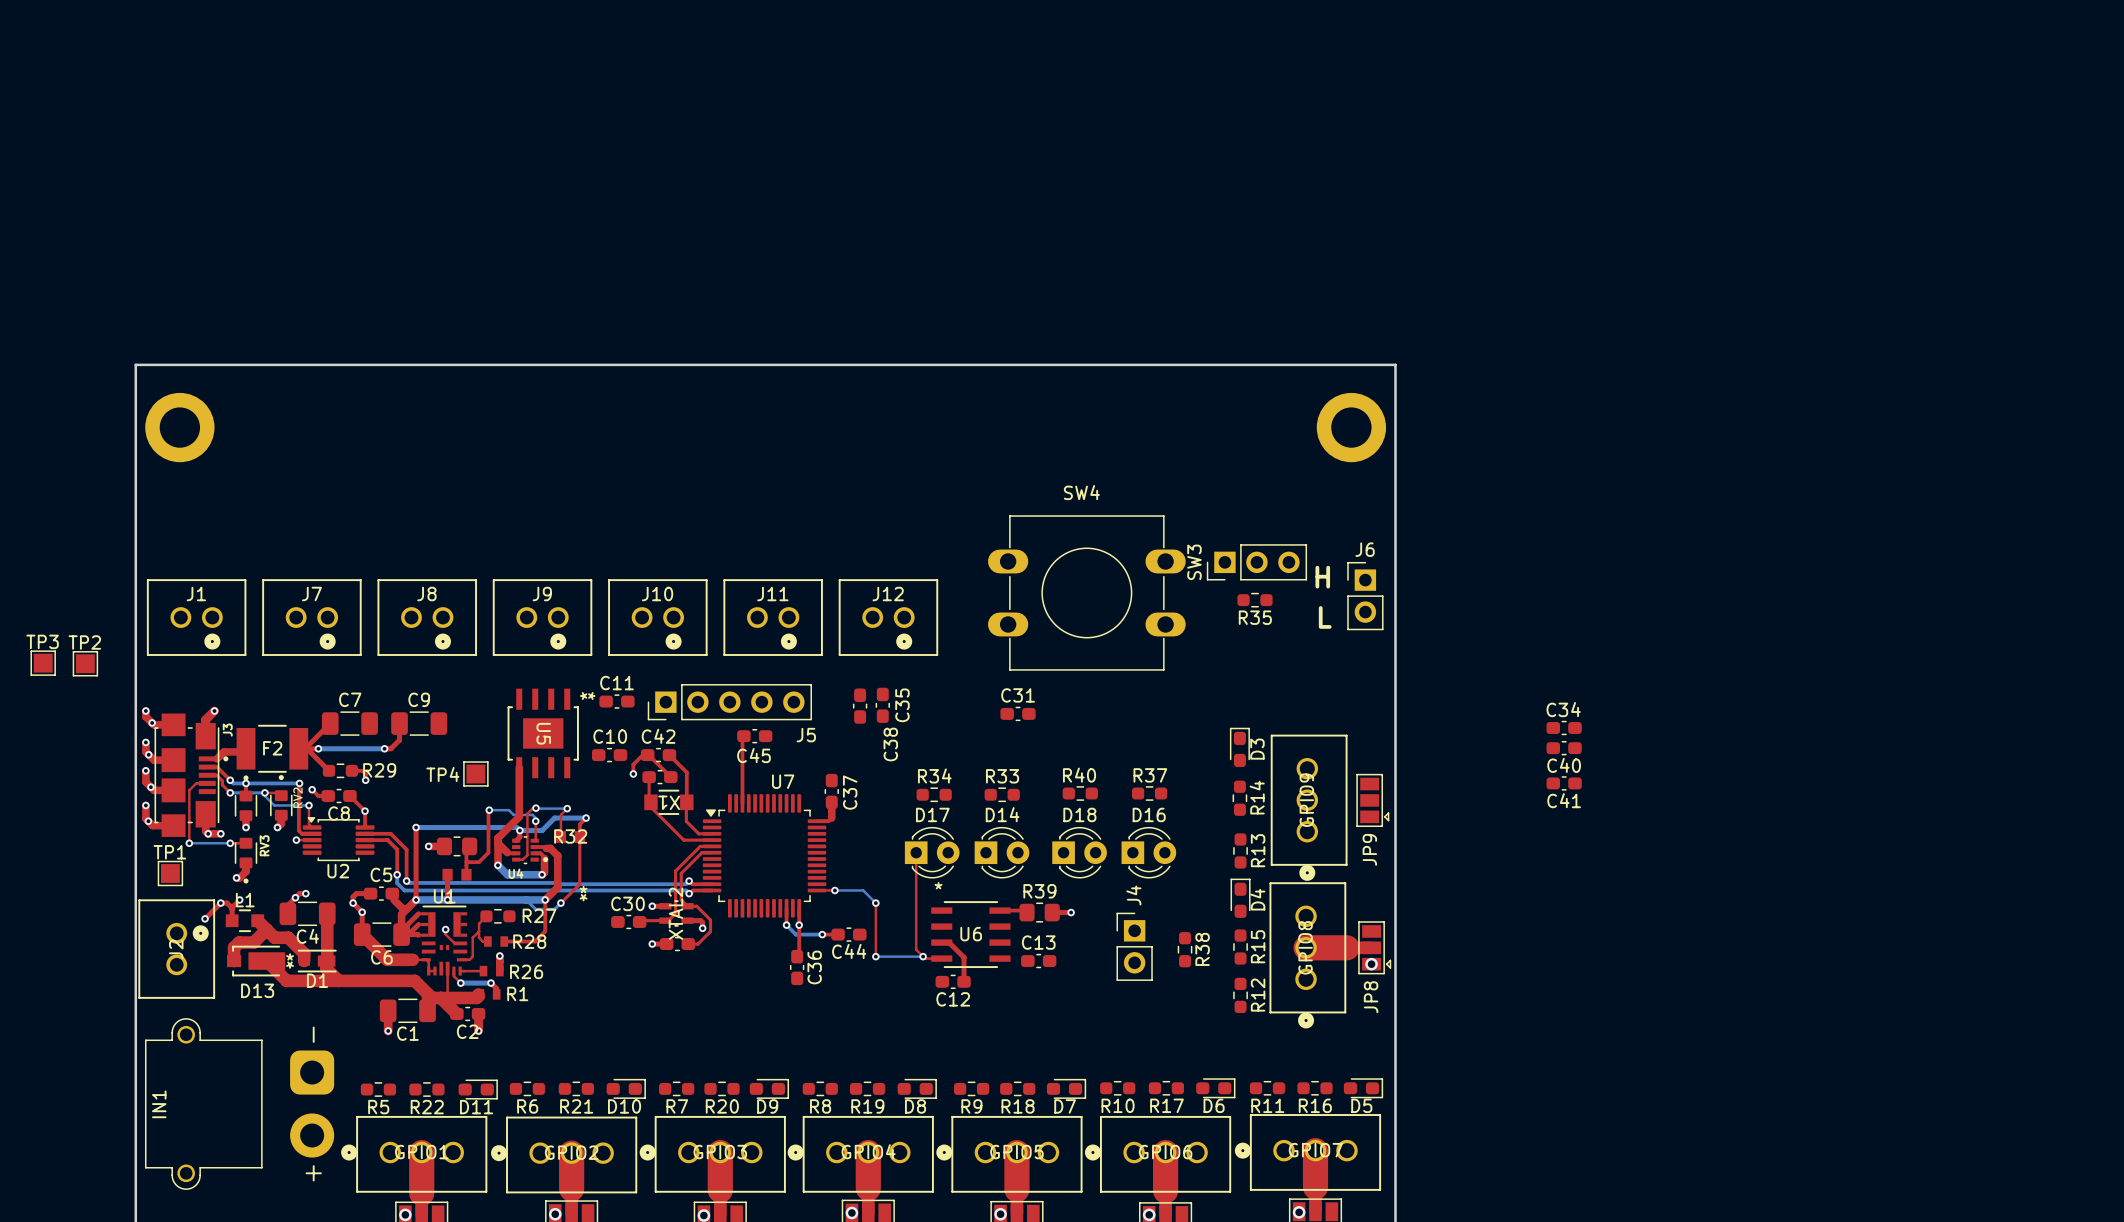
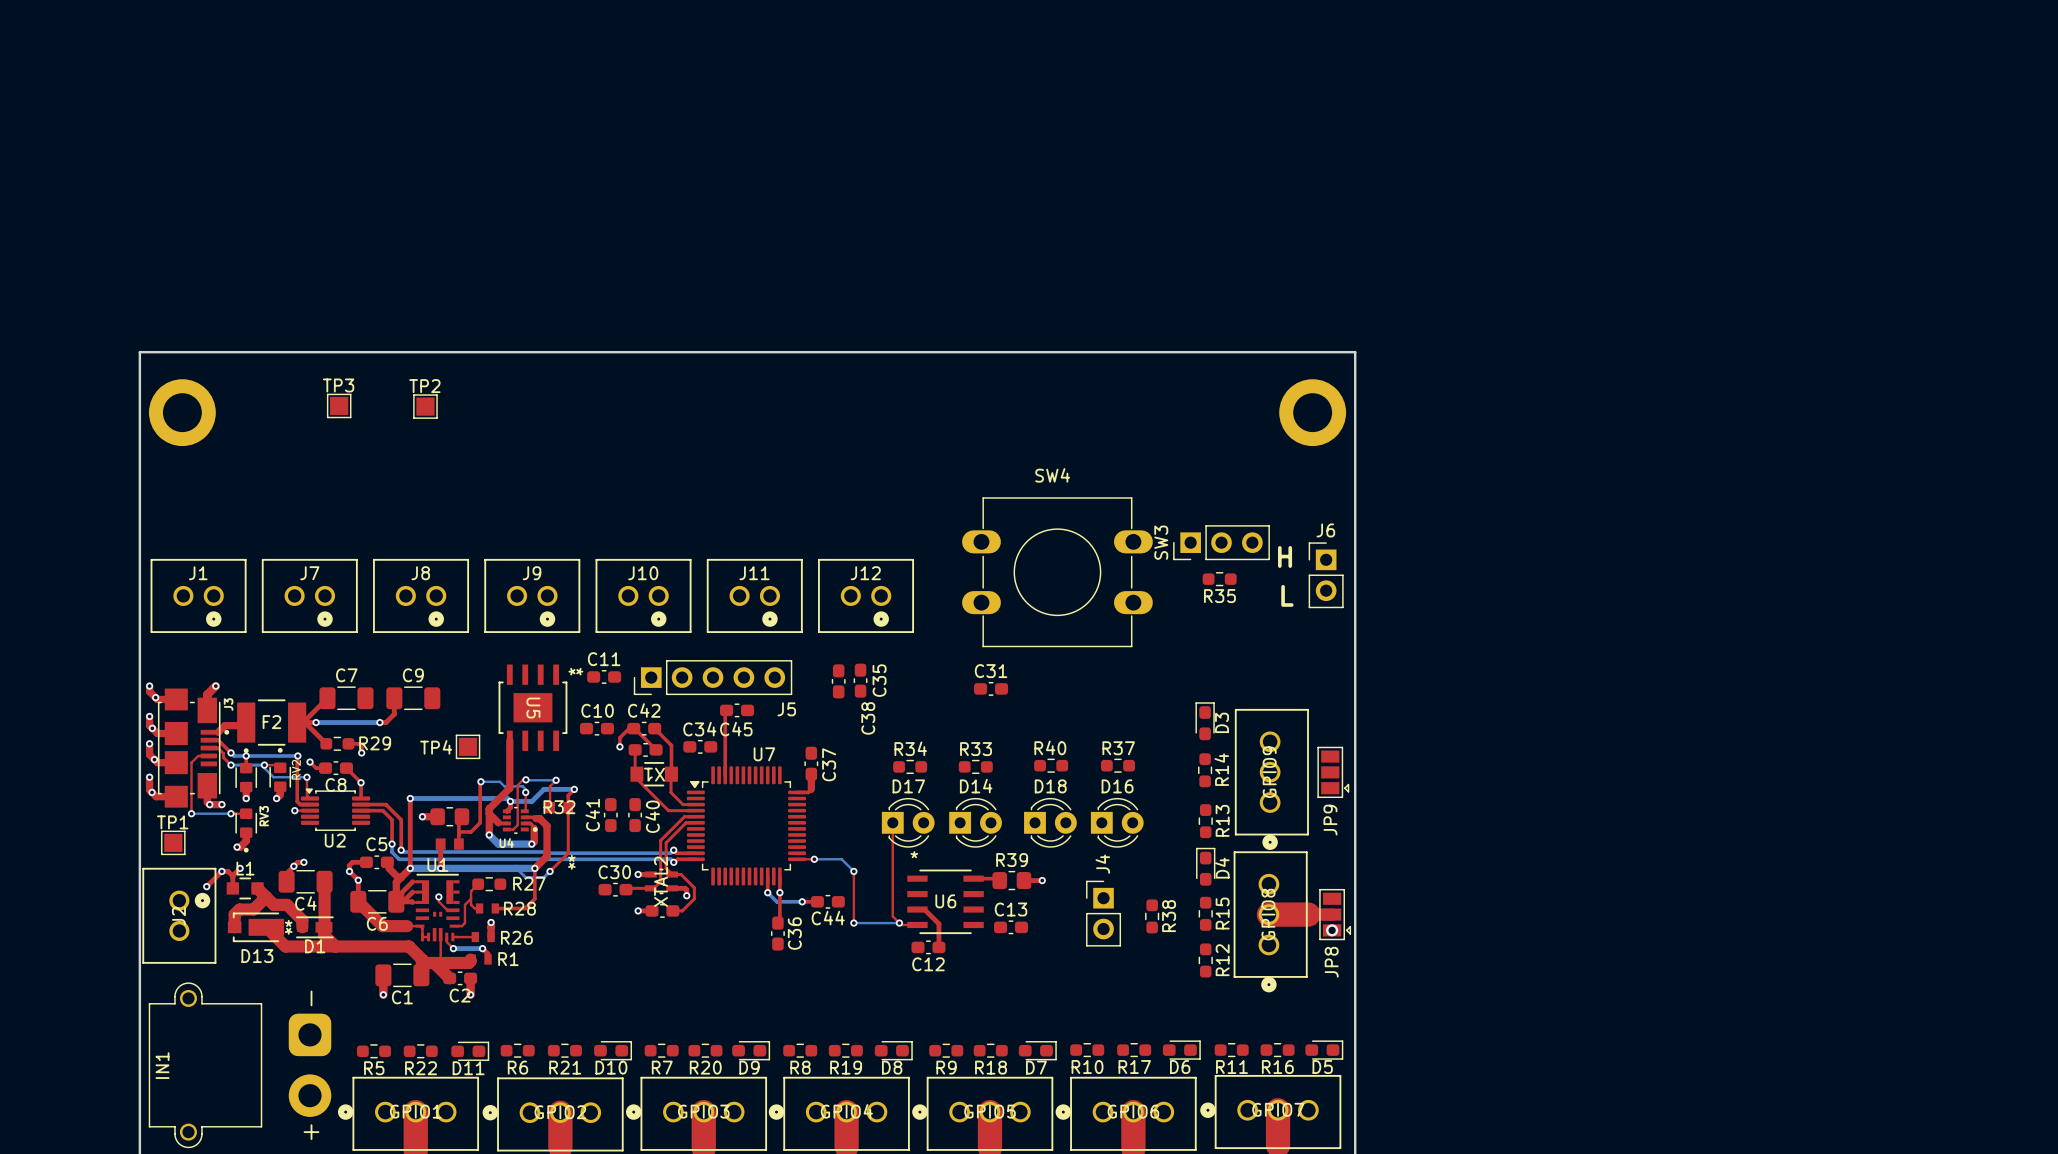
TP3 position: (43, 663) -> (339, 405)
TP2 position: (85, 663) -> (425, 406)
C34 position: (1564, 728) -> (700, 746)
C40 rotation: 0° (1564, 748) -> 90° clockwise (635, 815)
C40 position: (1564, 748) -> (635, 815)
C40 name position: C40 (1564, 765) -> C40 (652, 816)
C41 rotation: 0° (1564, 783) -> 90° clockwise (610, 815)
C41 position: (1564, 783) -> (610, 815)

